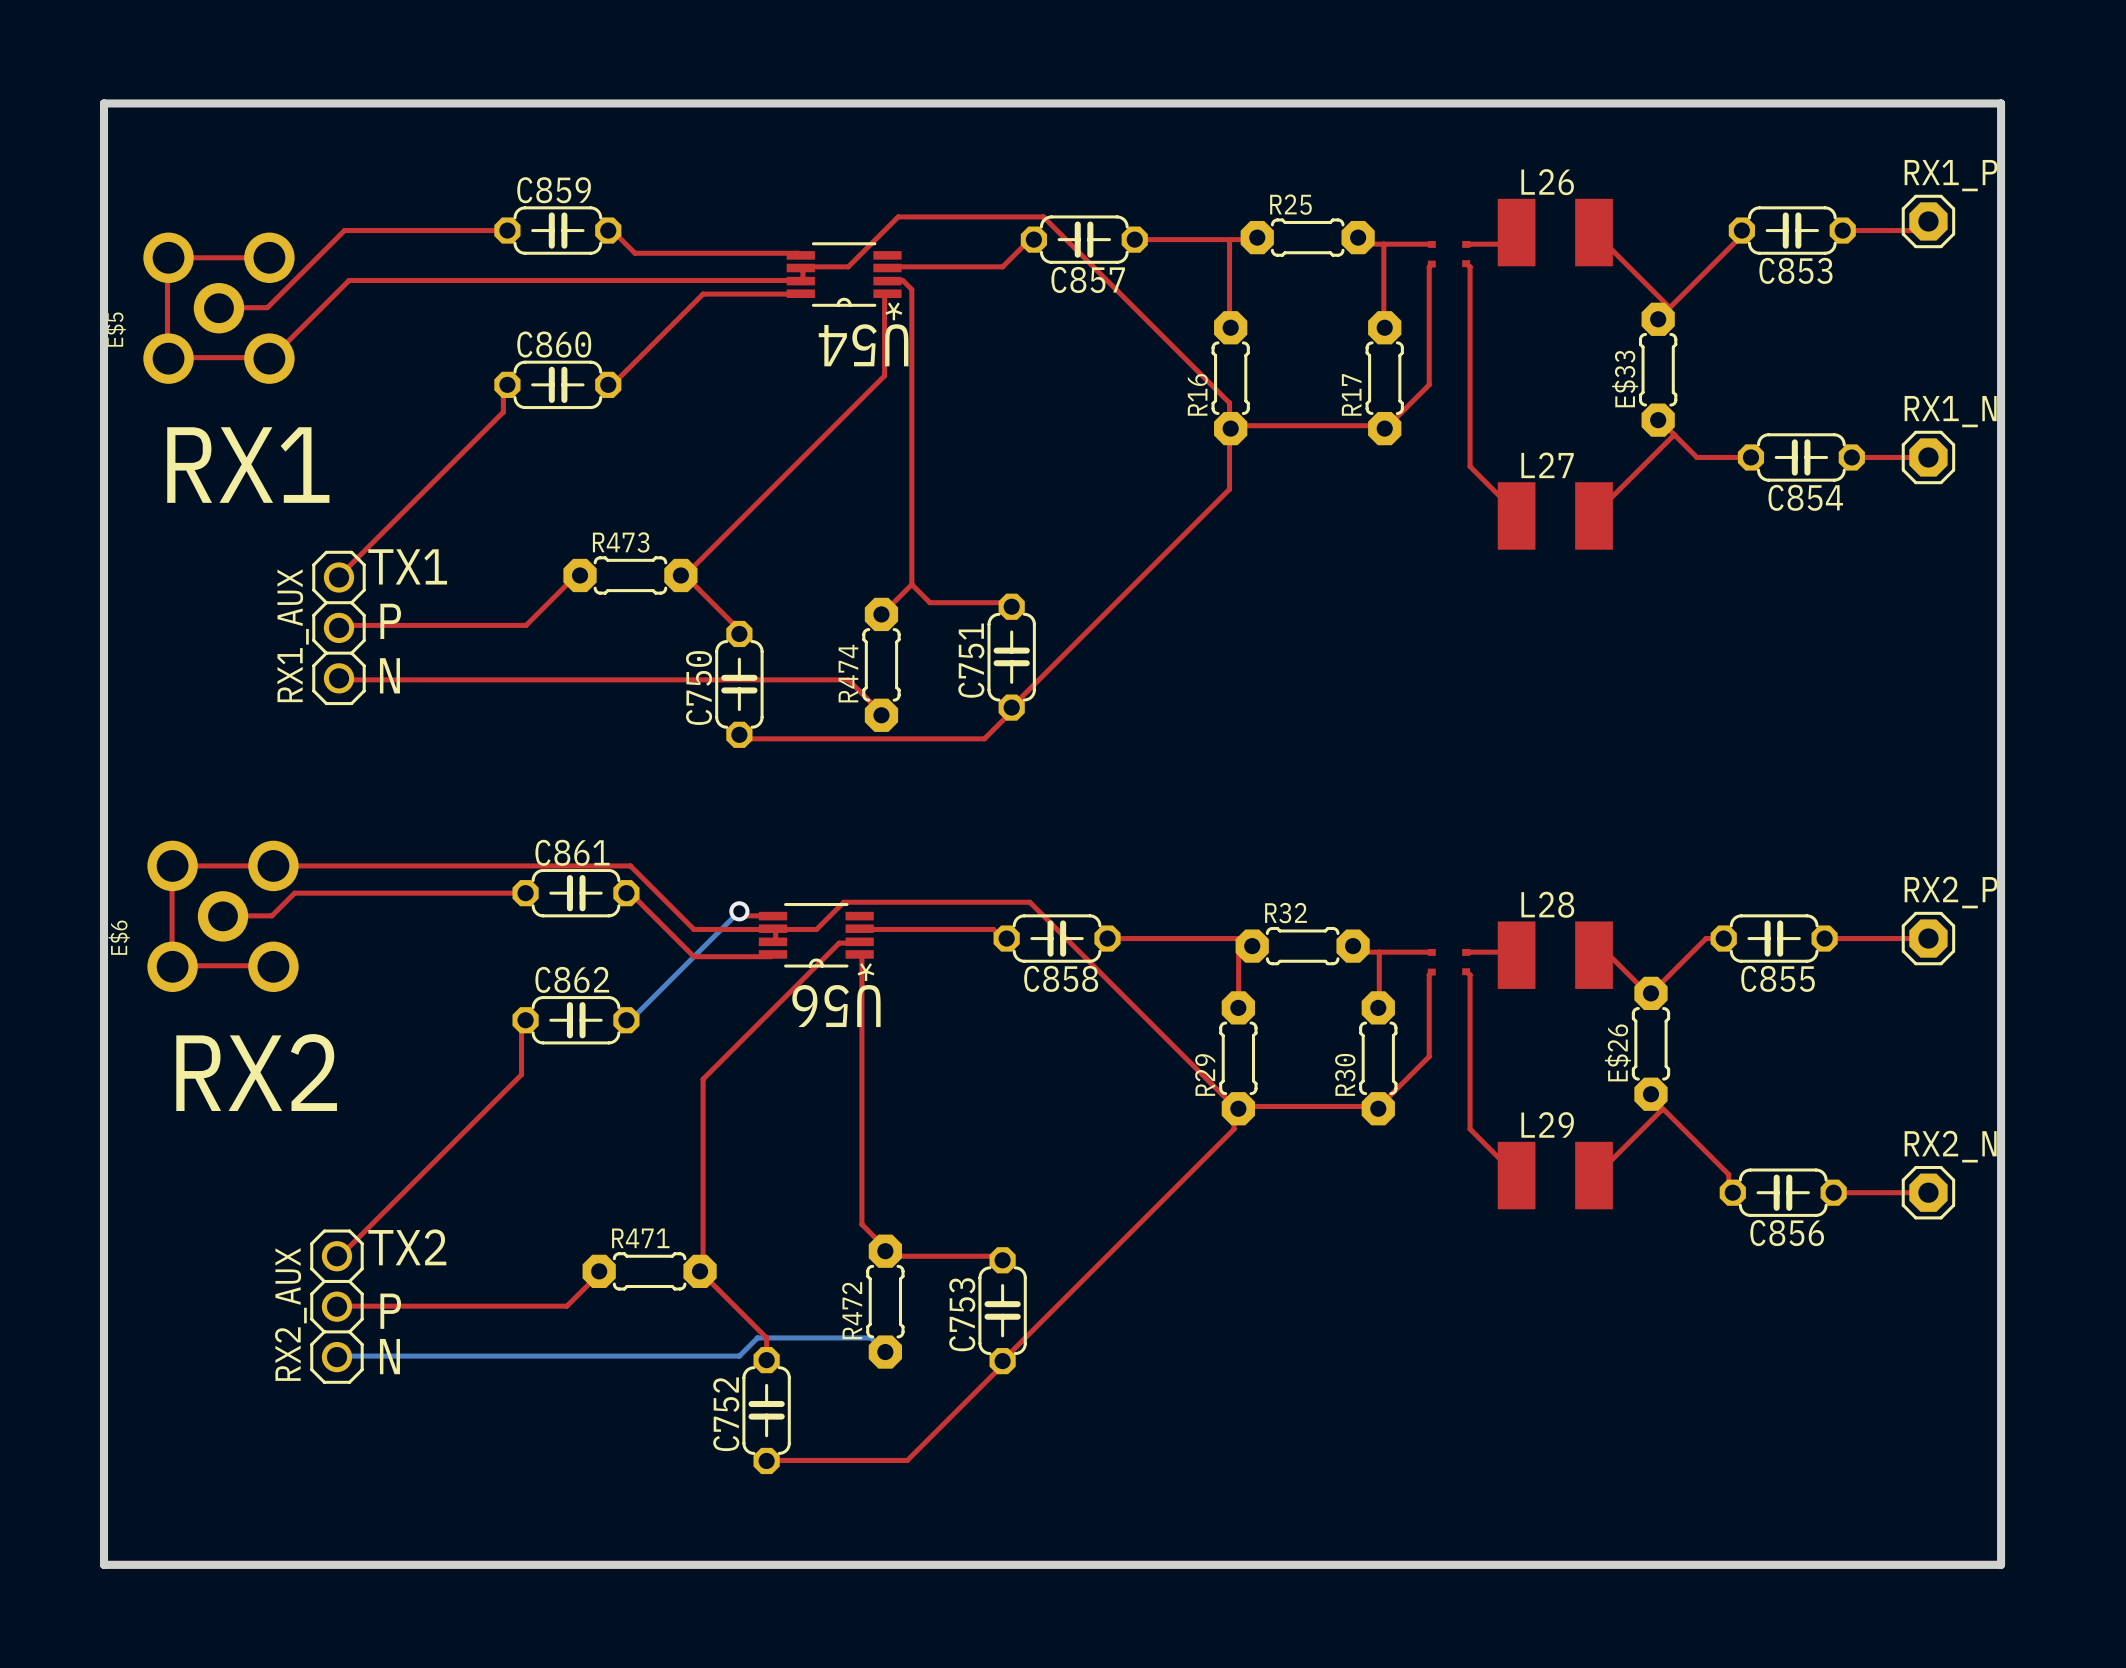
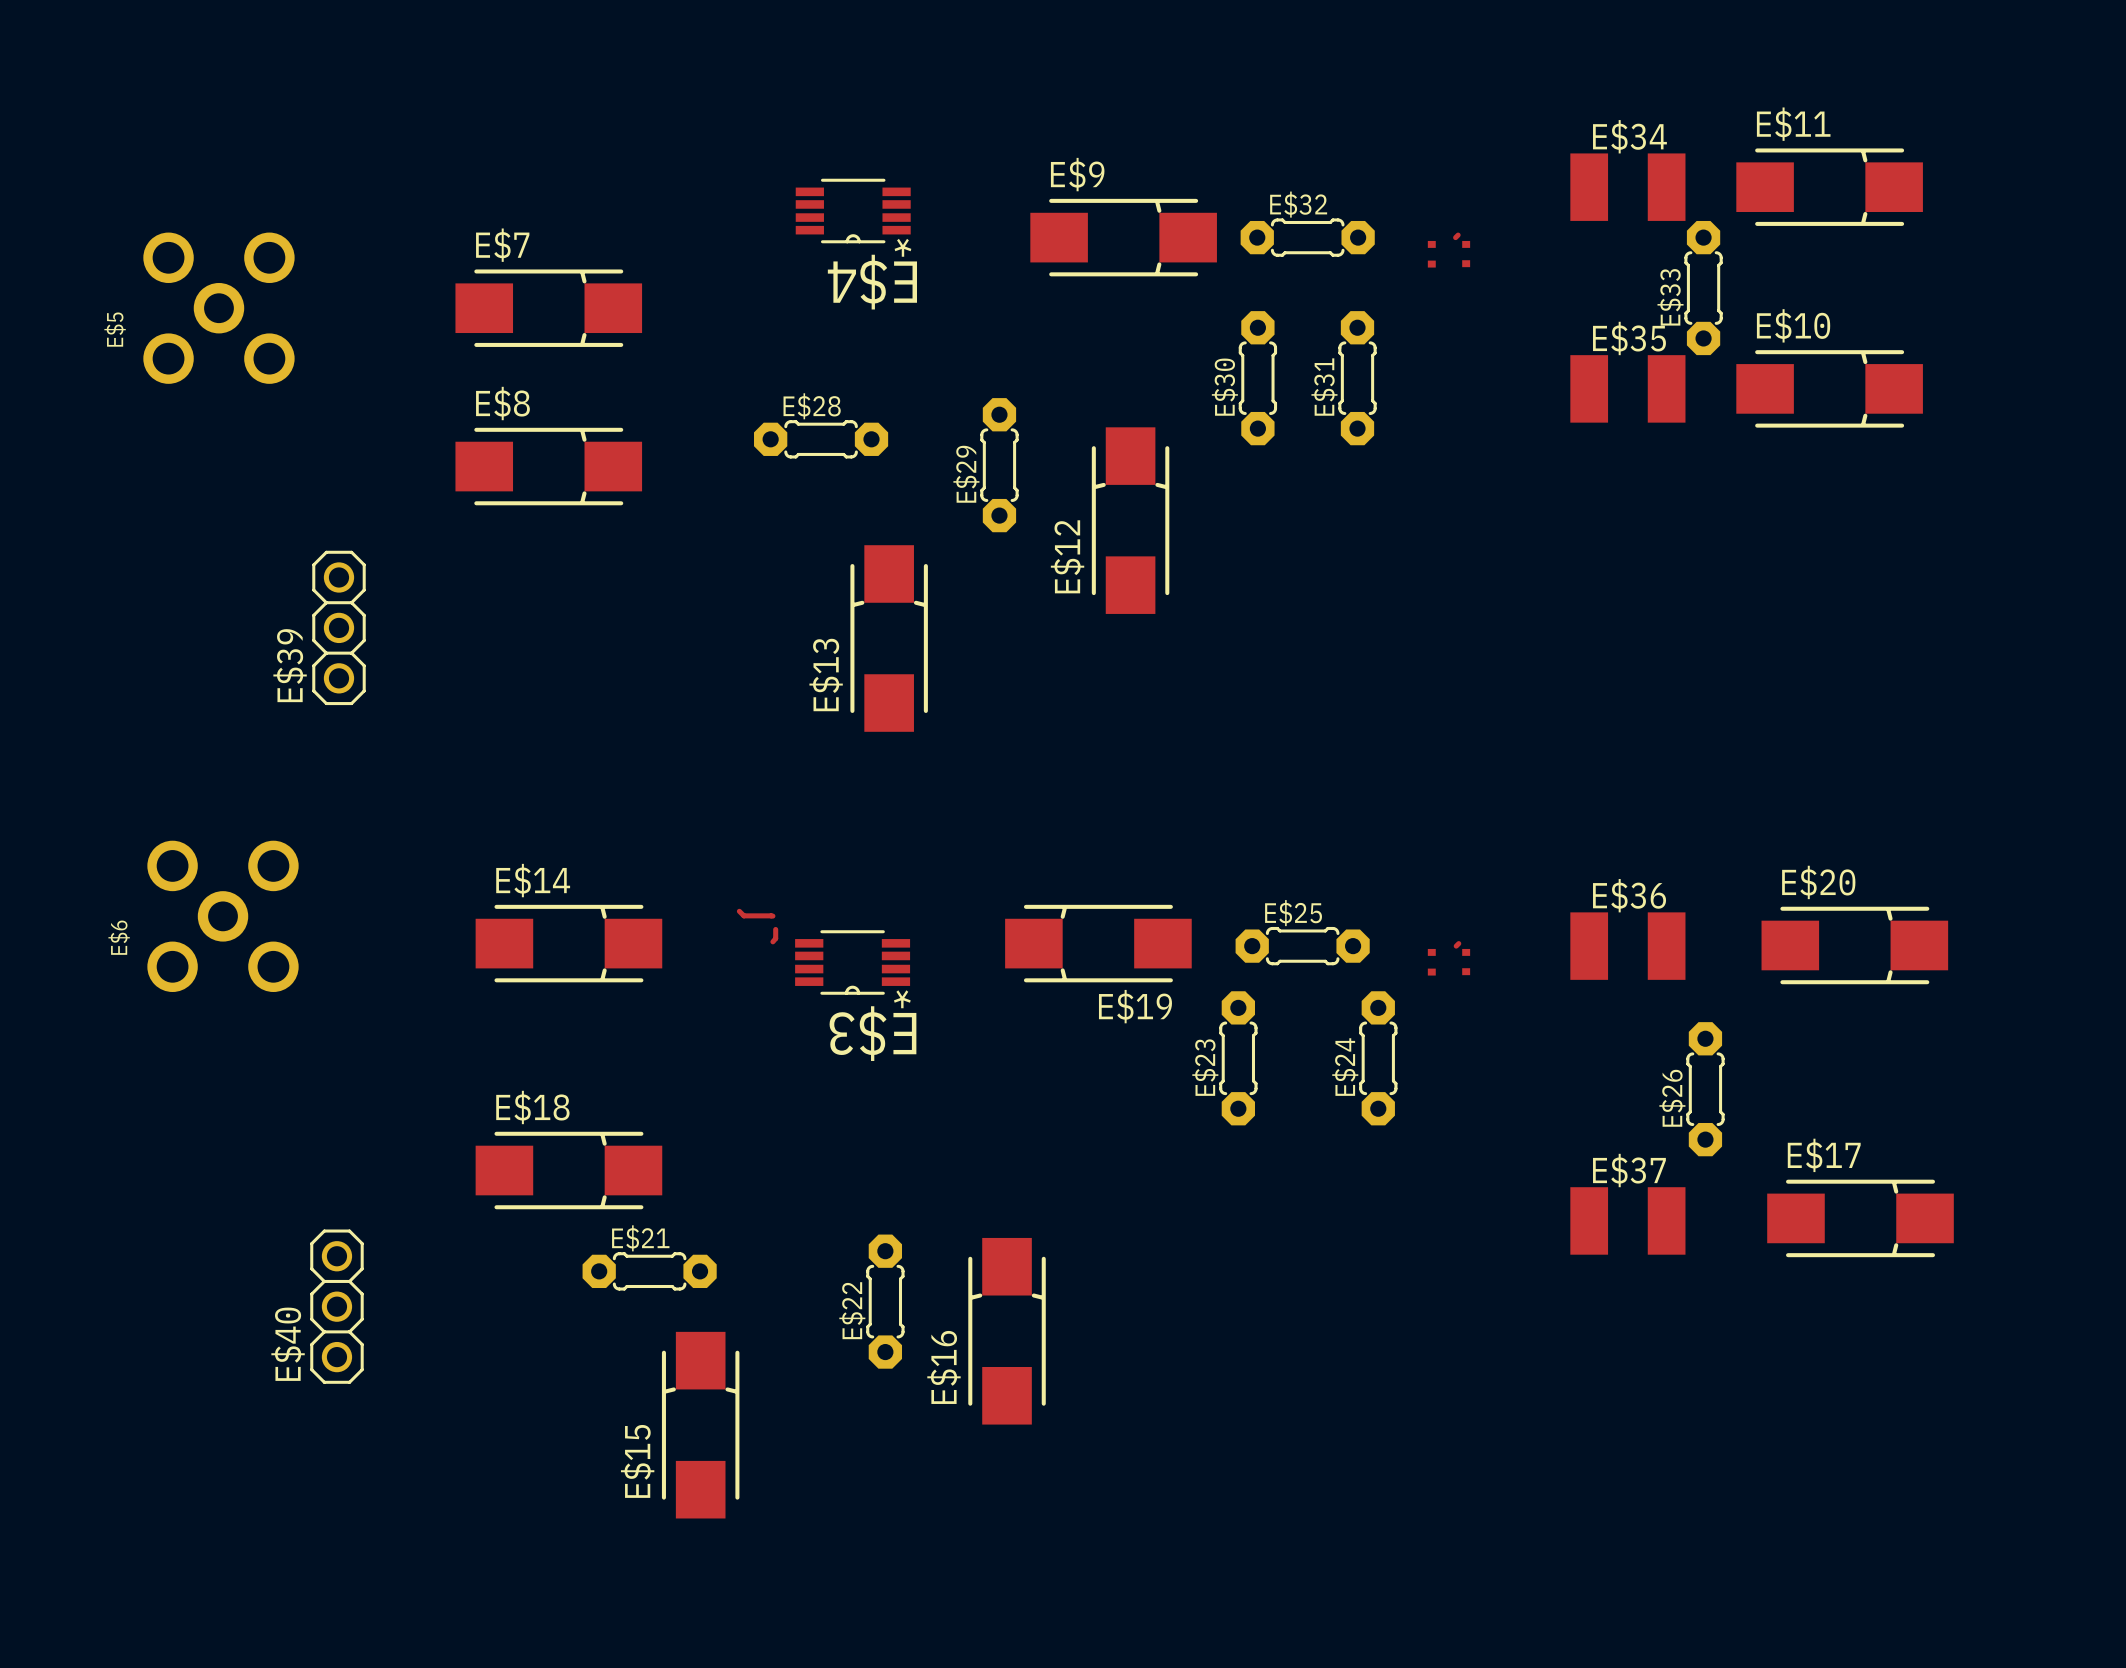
board edge: (104, 103) (2001, 103) (2001, 1564) (104, 1564) (104, 103) -> none
E$34: none -> (1627, 187)
E$11: none -> (1829, 187)
R25 name: R25 (1290, 204) -> E$32 (1298, 204)
E$4: none -> (853, 211)
top track: (1928, 221) (1919, 230) (1842, 230) -> none
RX1_P: (1928, 221) -> none
top track: (507, 230) (344, 230) (267, 307) (218, 308) -> none
C859: (557, 230) -> none
top track: (608, 230) (612, 230) (635, 253) (798, 253) (800, 255) -> none
top track: (1741, 230) (1737, 230) (1737, 239) (1658, 319) -> none
C853: (1792, 230) -> none
top track: (1516, 232) (1506, 244) (1466, 244) -> none
L26: (1555, 232) -> none
top track: (1594, 232) (1669, 307) -> none
top track: none -> (1458, 235) (1455, 237)
E$9: none -> (1123, 237)
top track: (1257, 237) (1256, 239) (1134, 239) -> none
top track: (1358, 237) (1365, 244) (1431, 244) -> none
top track: (1033, 239) (1029, 239) (1002, 266) (887, 267) -> none
C857: (1084, 239) -> none
top track: (1229, 239) (1230, 327) -> none
top track: (1383, 244) (1384, 327) -> none
top track: (269, 257) (167, 257) (167, 357) (271, 357) (349, 280) (800, 281) (802, 280) (802, 271) (800, 267) (802, 266) (848, 266) (898, 216) (1043, 216) (1229, 403) (1230, 428) -> none
top track: (1466, 263) (1470, 266) (1470, 466) (1515, 511) (1516, 515) -> none
top track: (1431, 264) (1429, 266) (1429, 384) (1388, 425) (1384, 428) (1383, 425) (1234, 425) (1230, 428) -> none
U54: (844, 274) -> none
top track: (887, 281) (902, 280) (911, 289) (911, 584) -> none
top track: (800, 293) (703, 294) (612, 384) (608, 384) -> none
top track: (887, 293) (884, 294) (884, 375) (684, 575) -> none
E$7: none -> (548, 308)
E$33 position: (1658, 369) -> (1703, 288)
R16: (1230, 378) -> none
E$30: none -> (1257, 378)
E$31: none -> (1357, 378)
R17: (1384, 378) -> none
top track: (507, 384) (503, 384) (503, 412) (338, 577) -> none
C860: (557, 384) -> none
E$35: none -> (1627, 388)
E$10: none -> (1829, 388)
top track: (1658, 420) (1697, 457) (1750, 457) -> none
top track: (1230, 428) (1229, 489) (1011, 707) (1011, 711) (984, 738) (739, 738) (739, 734) -> none
top track: (1674, 434) (1594, 515) -> none
E$28: none -> (821, 439)
C854: (1801, 457) -> none
top track: (1851, 457) (1928, 457) -> none
RX1_N: (1928, 457) -> none
text: RX1 (248, 465) -> none
E$29: none -> (999, 465)
E$8: none -> (548, 466)
L27: (1555, 515) -> none
E$12: none -> (1130, 520)
text: TX1 (407, 566) -> none
top track: (580, 575) (576, 575) (526, 625) (340, 625) (338, 627) -> none
R473: (630, 575) -> none
top track: (684, 575) (739, 629) (739, 633) -> none
top track: (911, 584) (881, 614) -> none
top track: (911, 584) (930, 602) (1011, 602) (1011, 606) -> none
text: P (390, 621) -> none
RX1_AUX name: RX1_AUX (293, 635) -> E$39 (290, 665)
E$13: none -> (889, 638)
C751: (1011, 657) -> none
R474: (881, 664) -> none
text: N (389, 675) -> none
top track: (338, 678) (340, 679) (848, 679) (881, 715) -> none
C750: (739, 684) -> none
top track: (525, 893) (294, 893) (271, 915) (223, 916) -> none
C861: (576, 893) -> none
top track: (626, 893) (630, 893) (694, 956) (771, 956) (772, 954) -> none
bottom track: (739, 911) (630, 1020) (626, 1020) -> none
via: (739, 911) -> none
R32 name: R32 (1285, 913) -> E$25 (1293, 913)
top track: (859, 928) (993, 929) (1002, 938) (1006, 938) -> none
U56: (816, 935) -> none
C858: (1057, 938) -> none
top track: (1107, 938) (1247, 938) (1252, 943) (1252, 946) (1238, 938) (1238, 1006) (1238, 1007) -> none
top track: (1723, 938) (1706, 938) (1650, 993) (1647, 993) (1610, 956) (1594, 955) -> none
C855: (1774, 938) -> none
top track: (1824, 938) (1928, 938) -> none
RX2_P: (1928, 938) -> none
top track: (859, 941) (839, 943) (703, 1079) (703, 1269) (700, 1271) (766, 1337) (766, 1360) -> none
E$14: none -> (568, 943)
E$19: none -> (1098, 943)
top track: none -> (1458, 943) (1456, 946)
E$20: none -> (1854, 945)
top track: (1353, 946) (1361, 952) (1431, 952) -> none
E$36: none -> (1627, 946)
top track: (1379, 952) (1378, 1007) -> none
top track: (1466, 952) (1515, 952) (1516, 955) -> none
top track: (859, 954) (861, 956) (861, 1224) (884, 1247) (885, 1251) (889, 1251) (893, 1256) (1002, 1256) (1002, 1260) -> none
L28: (1555, 955) -> none
E$3: none -> (852, 962)
top track: (273, 966) (172, 966) (172, 865) (630, 865) (694, 929) (816, 929) (843, 902) (1029, 902) (1238, 1108) -> none
top track: (1466, 971) (1470, 974) (1470, 1129) (1516, 1175) -> none
top track: (1431, 972) (1429, 974) (1429, 1056) (1378, 1108) (1374, 1106) (1238, 1106) (1238, 1108) -> none
top track: (525, 1020) (521, 1020) (521, 1074) (340, 1256) (336, 1256) -> none
C862: (576, 1020) -> none
E$26 position: (1650, 1043) -> (1705, 1089)
text: RX2 (256, 1072) -> none
R30 name: R30 (1345, 1074) -> E$24 (1345, 1067)
R29 name: R29 (1205, 1075) -> E$23 (1205, 1067)
top track: (1238, 1108) (1234, 1111) (1234, 1129) (1002, 1360) (1002, 1365) (907, 1460) (766, 1460) -> none
E$18: none -> (568, 1170)
L29: (1555, 1175) -> none
top track: (1594, 1175) (1660, 1111) (1660, 1106) (1650, 1094) (1651, 1097) (1728, 1174) (1728, 1192) (1732, 1192) -> none
C856: (1783, 1192) -> none
top track: (1833, 1192) (1928, 1192) -> none
RX2_N: (1928, 1192) -> none
E$17: none -> (1860, 1218)
E$37: none -> (1627, 1220)
R471 name: R471 (640, 1238) -> E$21 (640, 1238)
text: TX2 (407, 1247) -> none
top track: (599, 1271) (598, 1274) (566, 1306) (336, 1306) -> none
R472 name: R472 (852, 1310) -> E$22 (852, 1310)
C753: (1002, 1310) -> none
text: P (390, 1311) -> none
RX2_AUX name: RX2_AUX (290, 1314) -> E$40 (288, 1344)
E$16: none -> (1007, 1331)
bottom track: (885, 1352) (871, 1337) (757, 1337) (739, 1356) (336, 1357) -> none
text: N (389, 1356) -> none
C752: (766, 1410) -> none
E$15: none -> (700, 1425)

